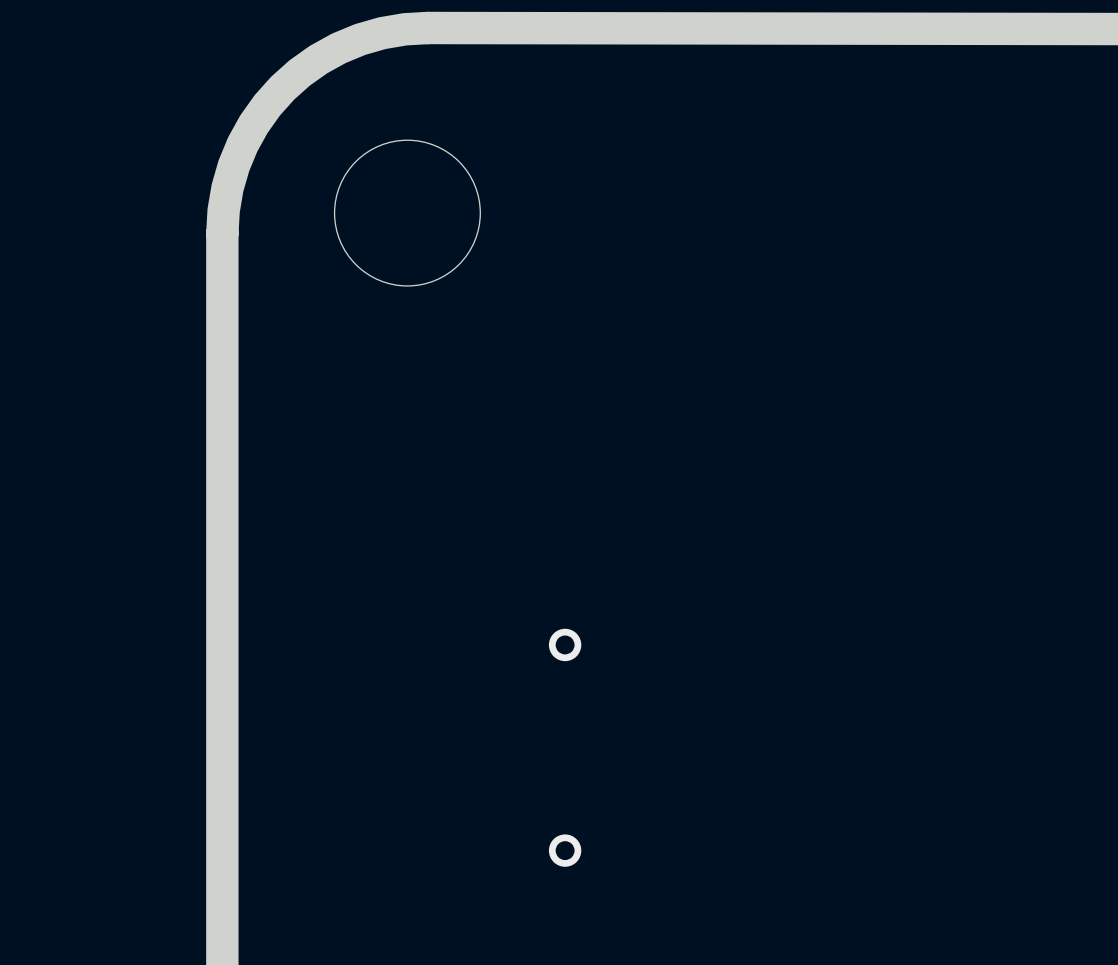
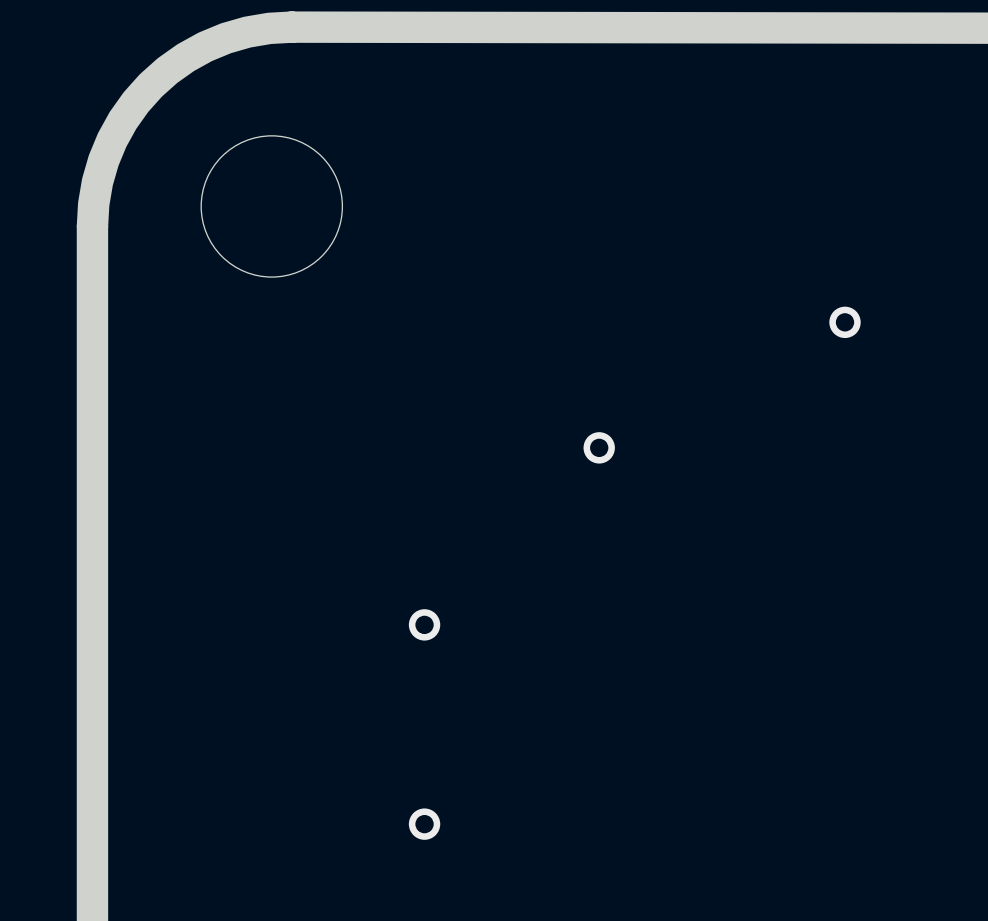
via: none -> (845, 322)
via: none -> (599, 447)

